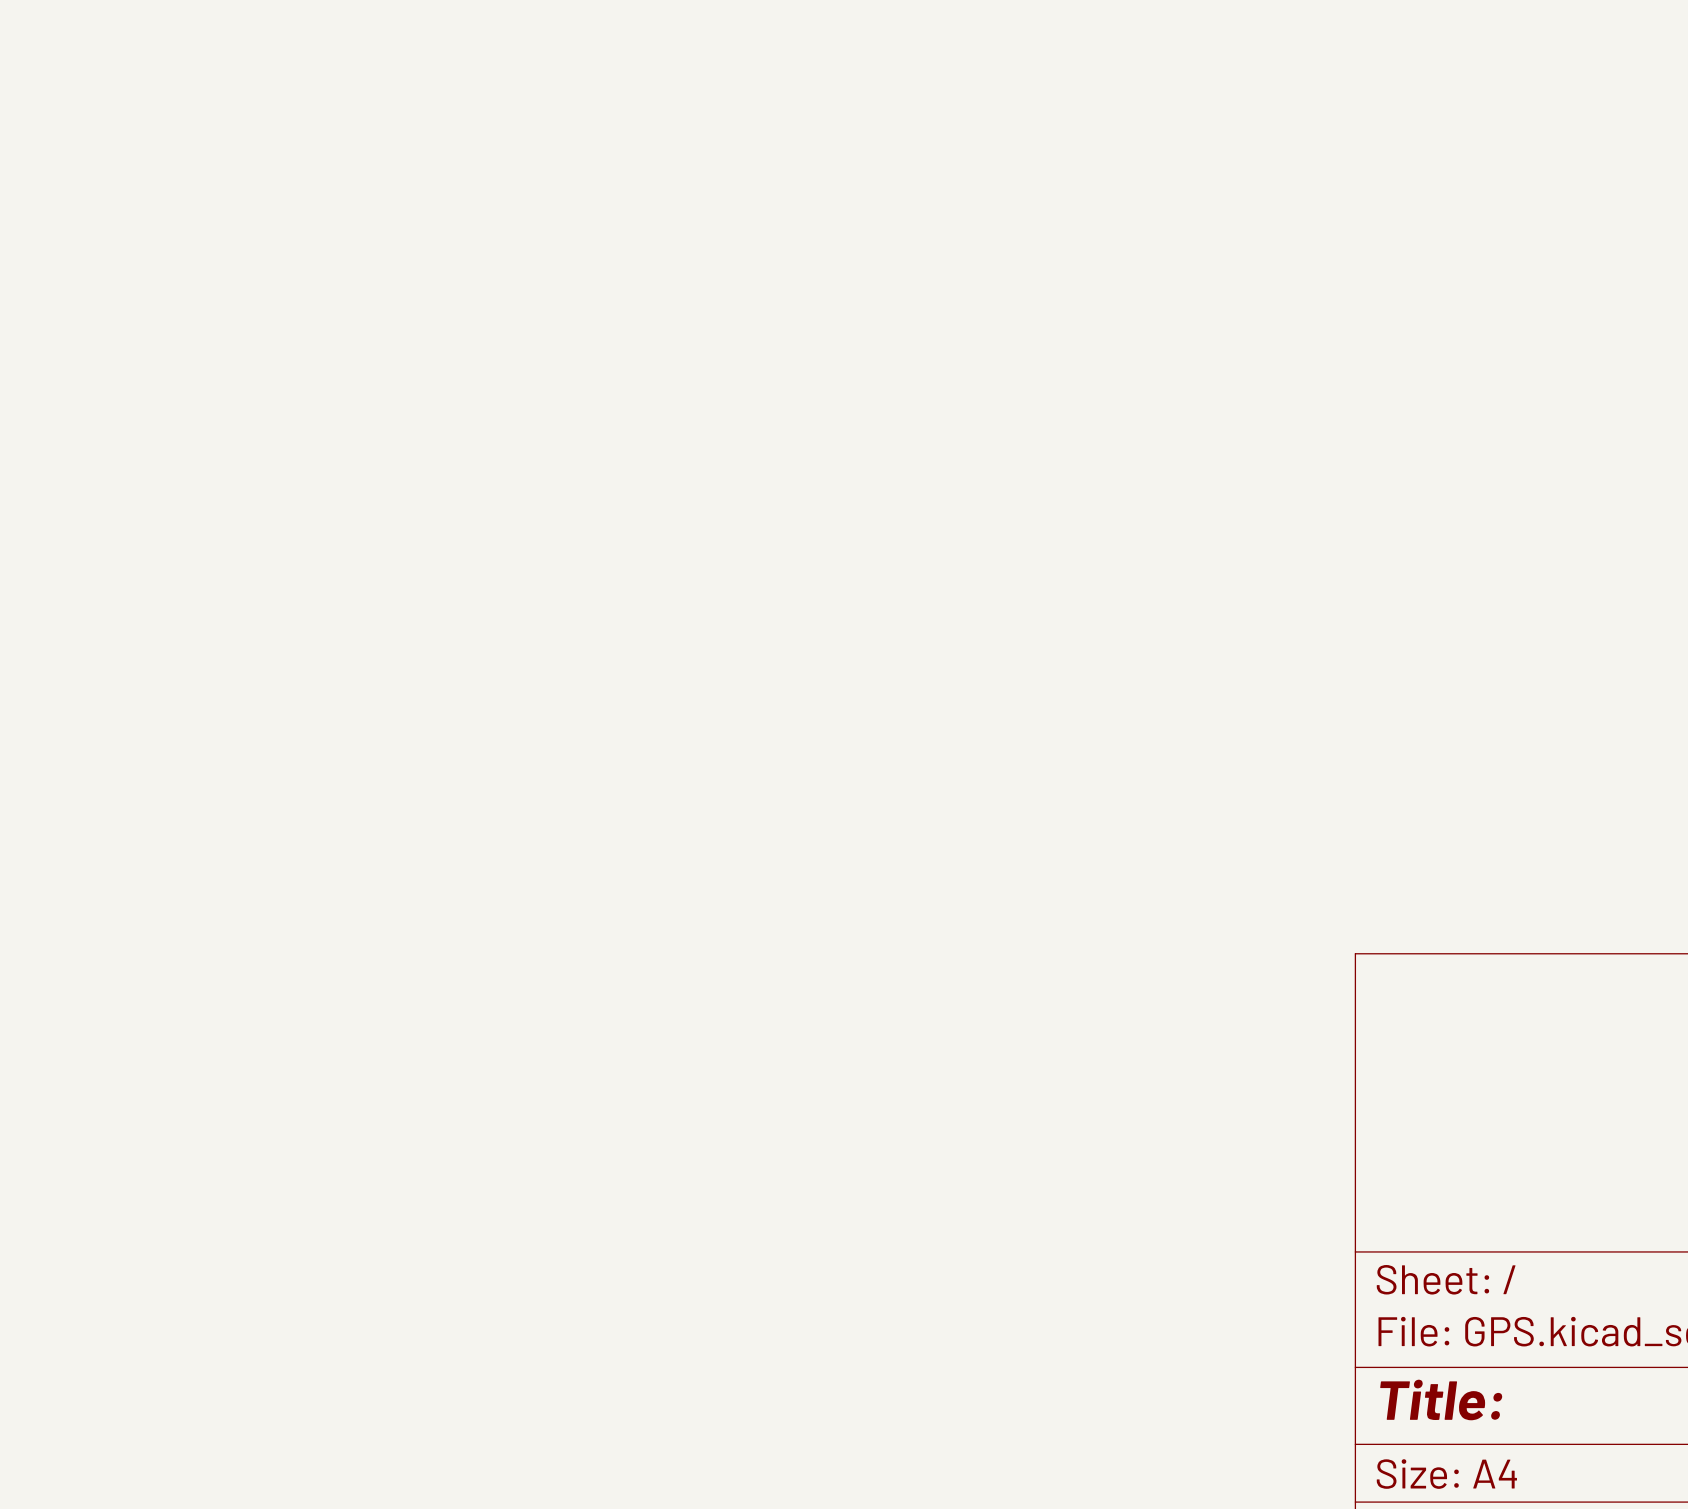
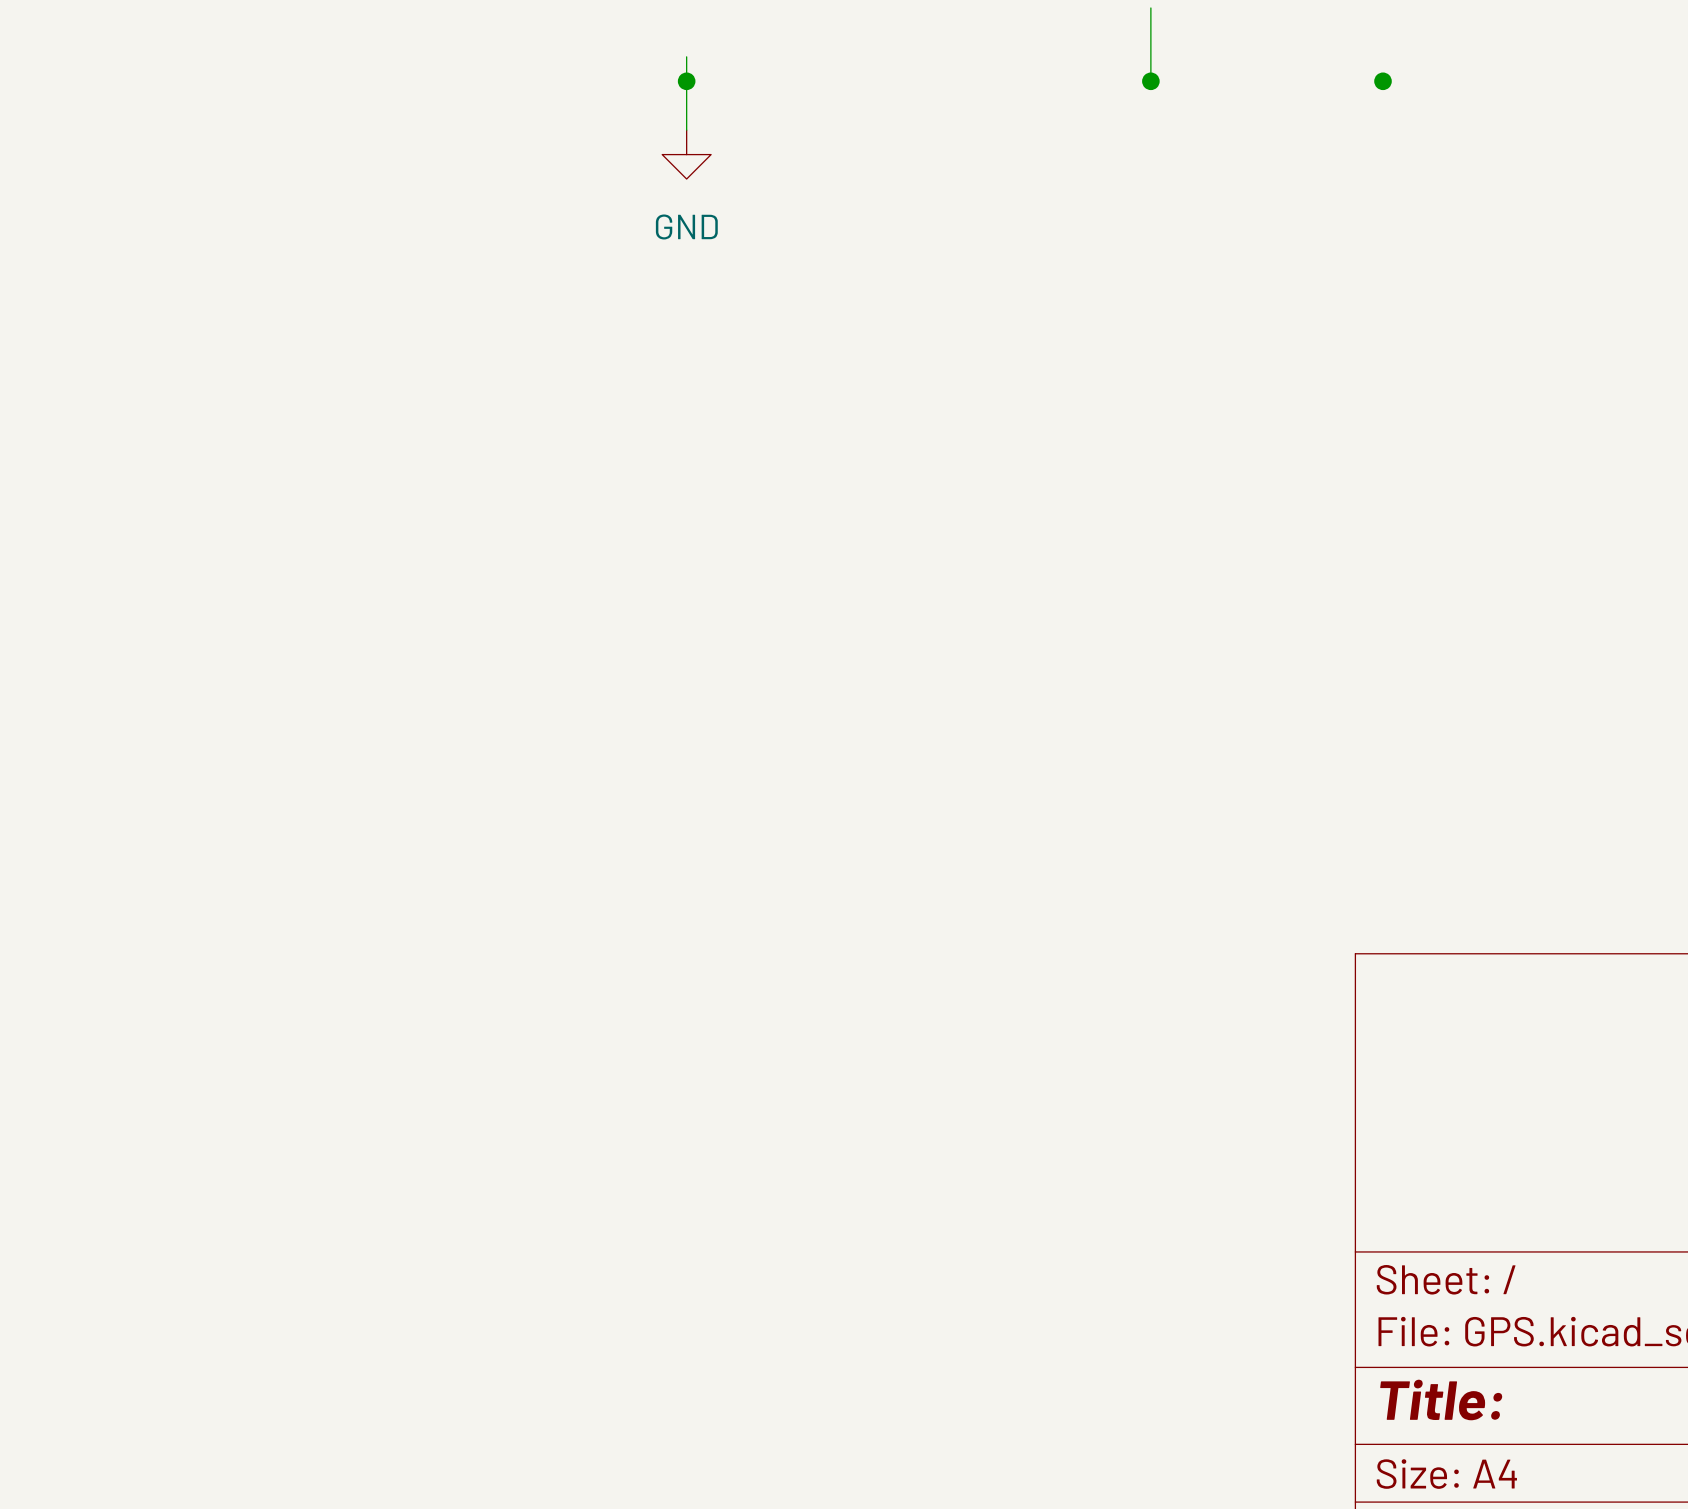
wire: none -> (1150, 7) (1150, 81)
wire: none -> (686, 56) (686, 130)
junction: none -> (686, 81)
junction: none -> (1150, 81)
junction: none -> (1383, 81)
power symbol: none -> GND (686, 154)

